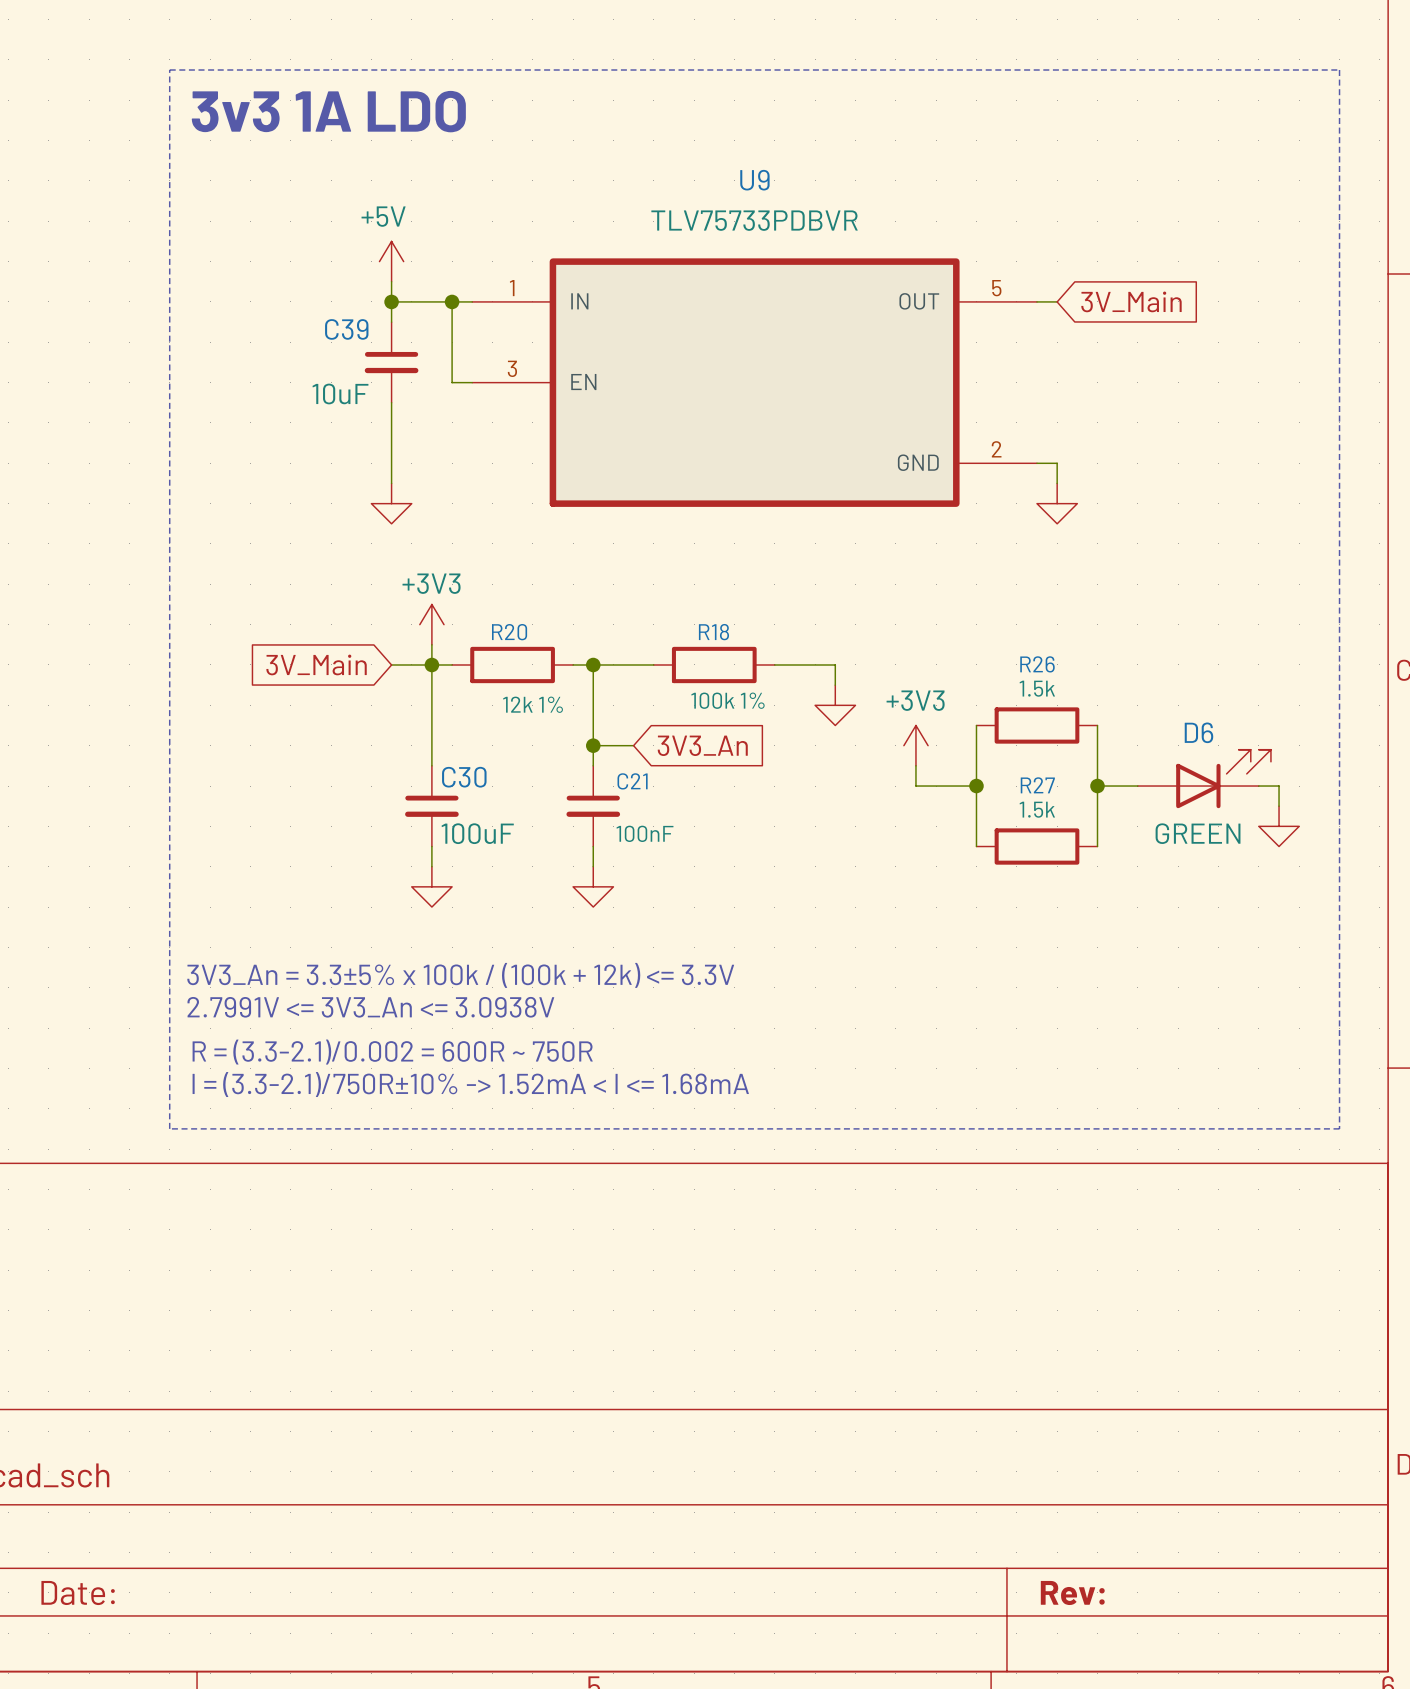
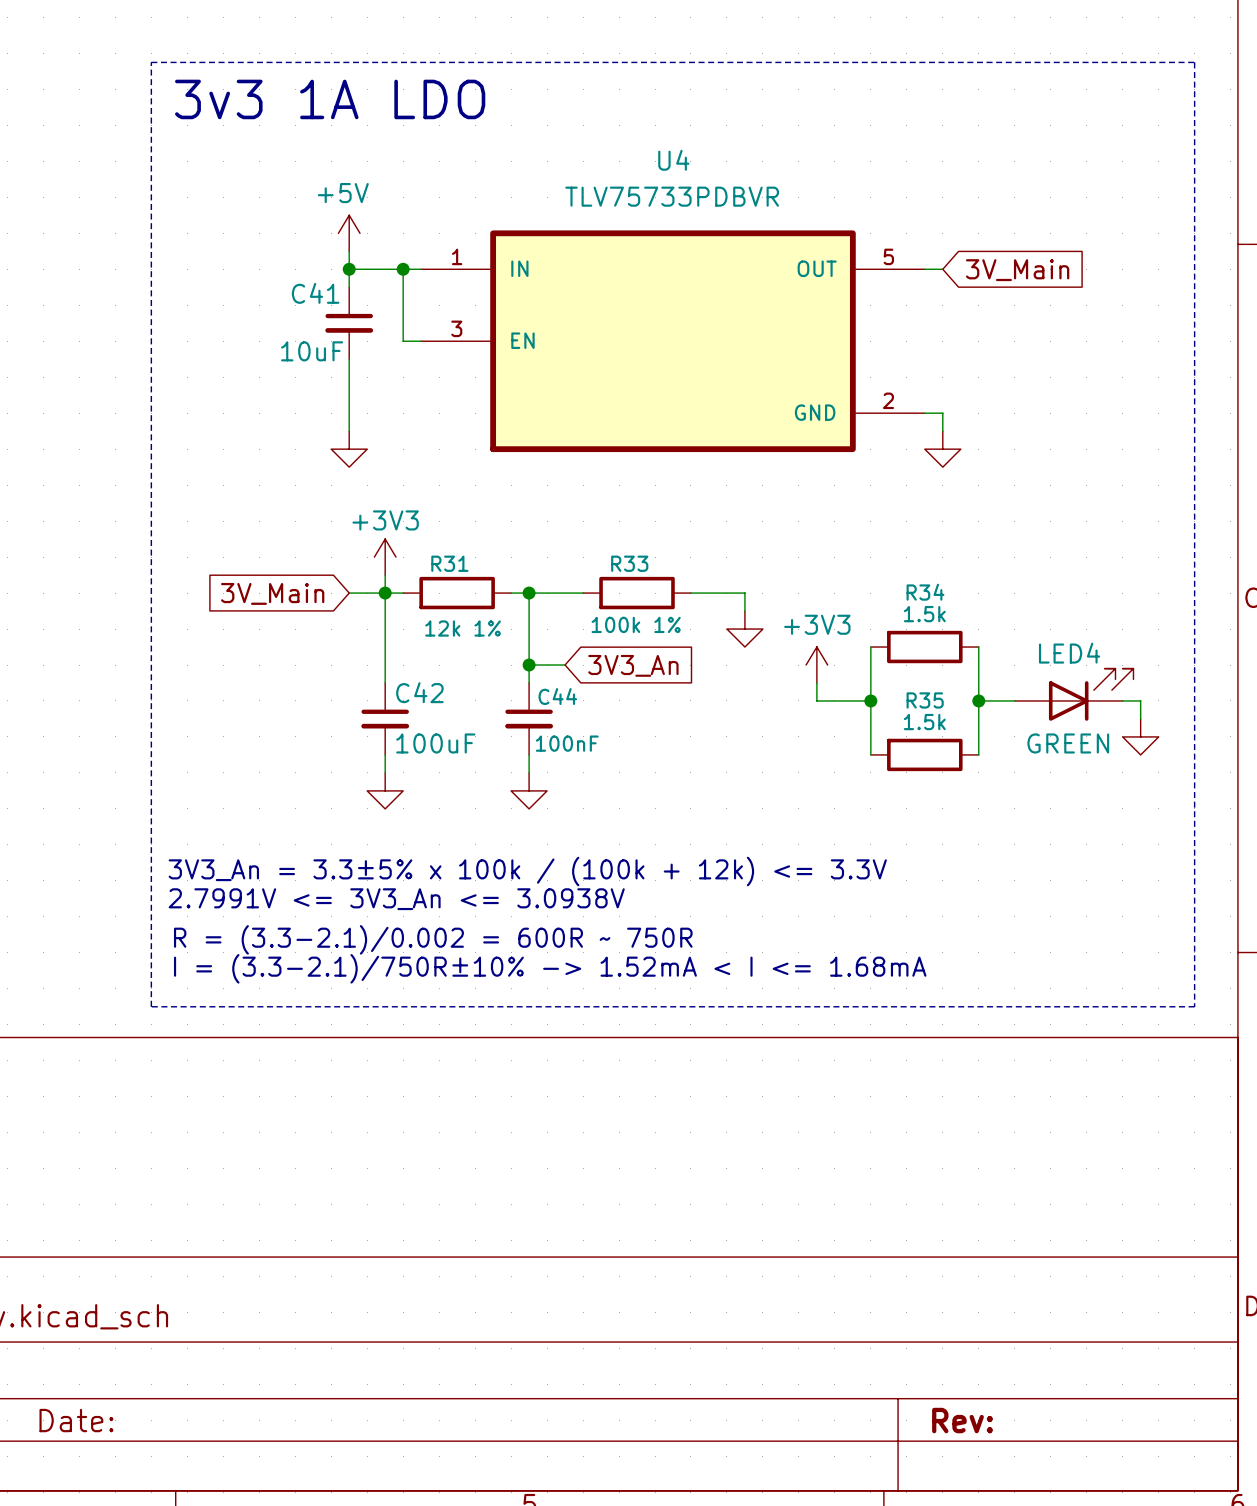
U9 name: U9 (754, 180) -> U4 (673, 160)
C39 name: C39 (346, 329) -> C41 (315, 293)
R20 name: R20 (509, 632) -> R31 (449, 563)
R18 name: R18 (713, 632) -> R33 (629, 563)
R26 name: R26 (1037, 664) -> R34 (925, 592)
D6 name: D6 (1198, 732) -> LED4 (1069, 653)
C30 name: C30 (464, 777) -> C42 (419, 692)
C21 name: C21 (632, 781) -> C44 (557, 696)
R27 name: R27 (1037, 785) -> R35 (925, 700)

